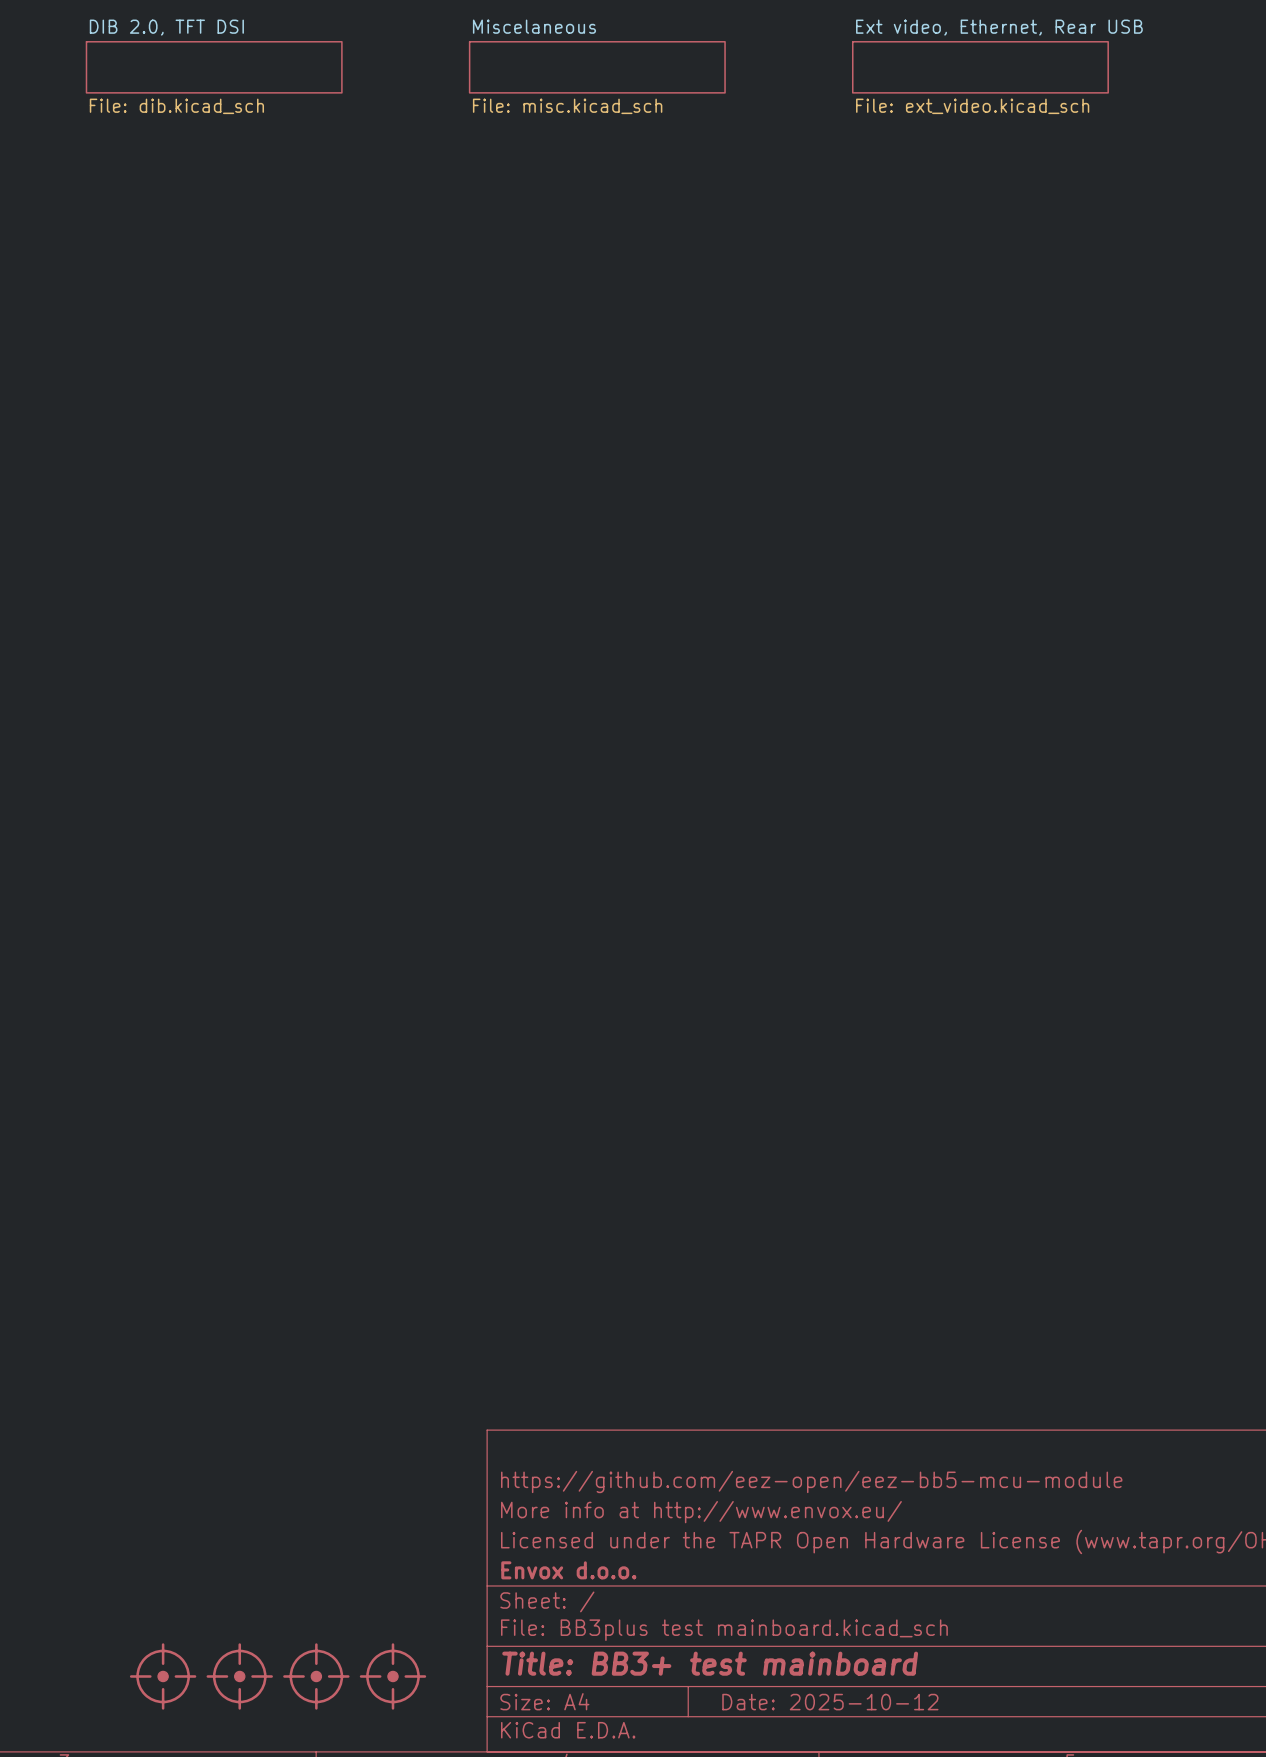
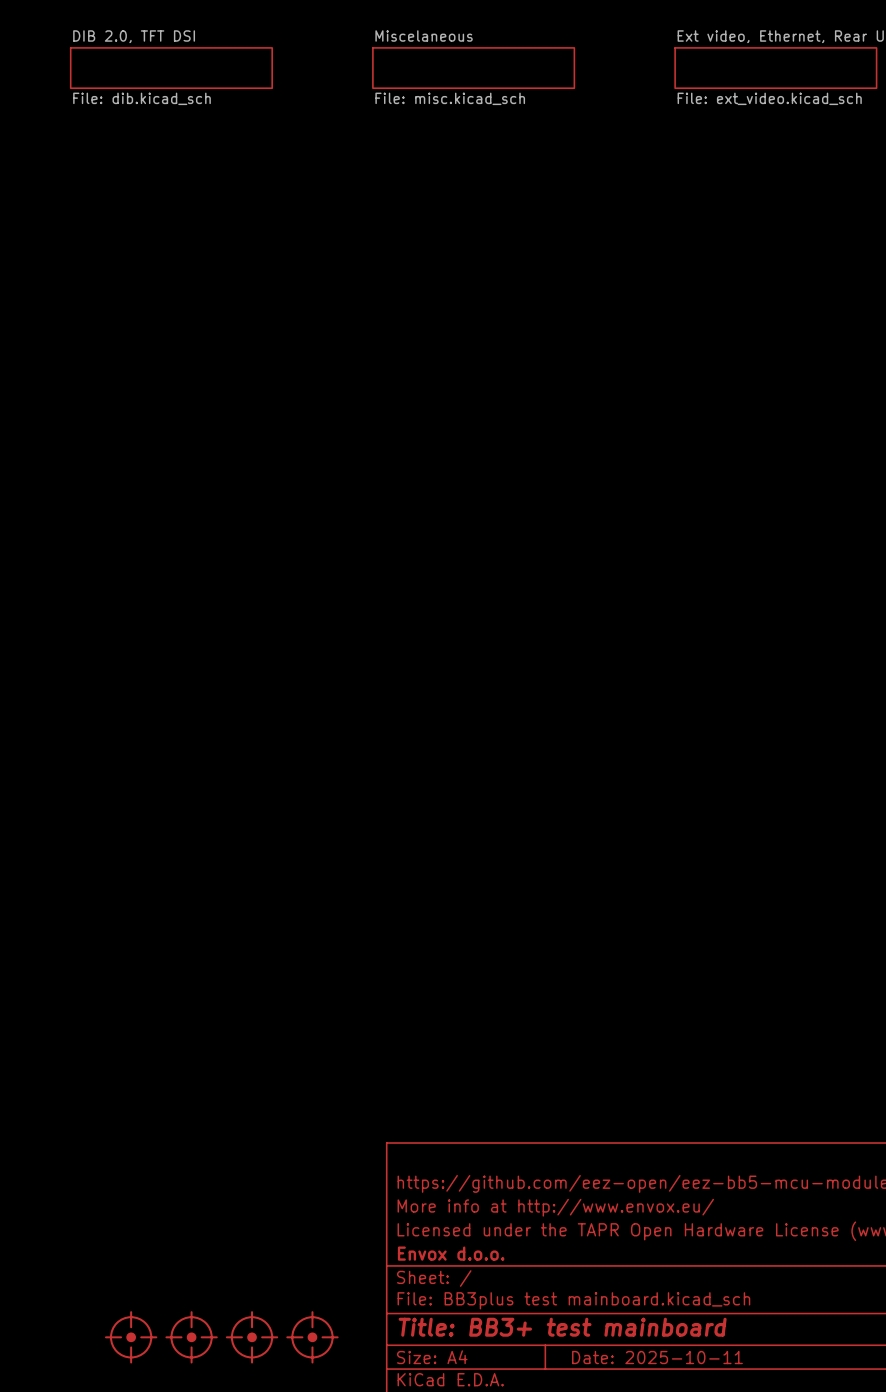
title block: Date: 2025-10-12 (830, 1702) -> Date: 2025-10-11 (657, 1357)

